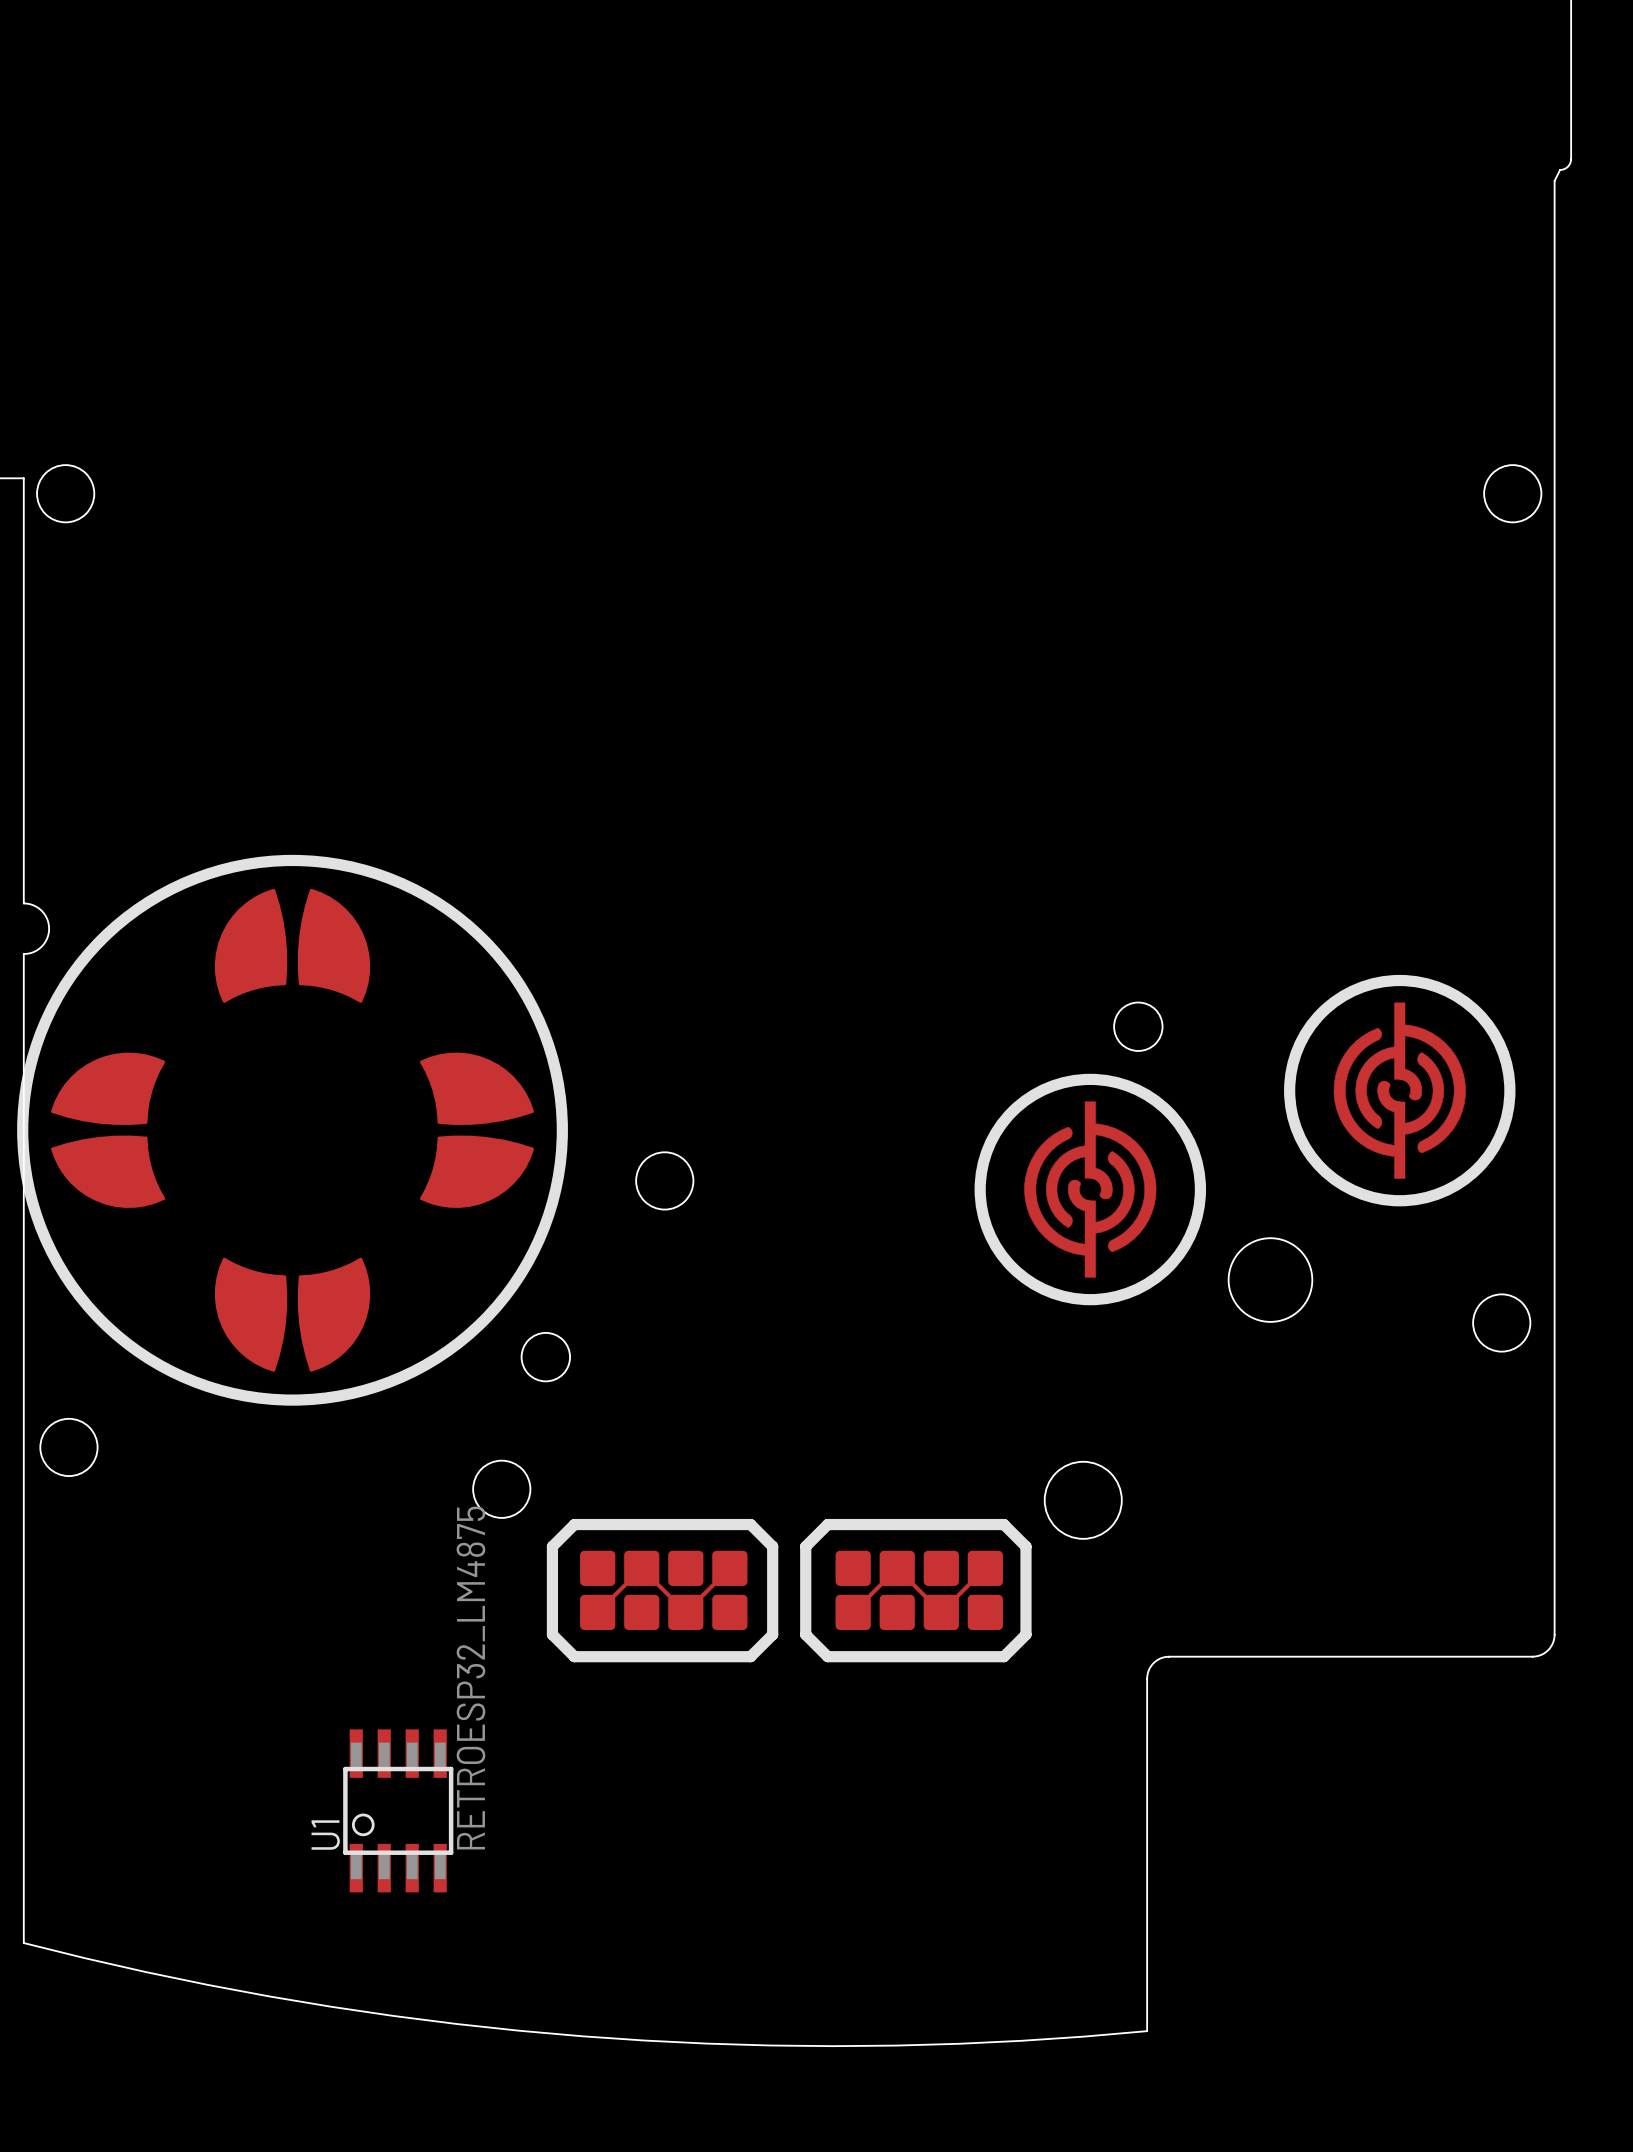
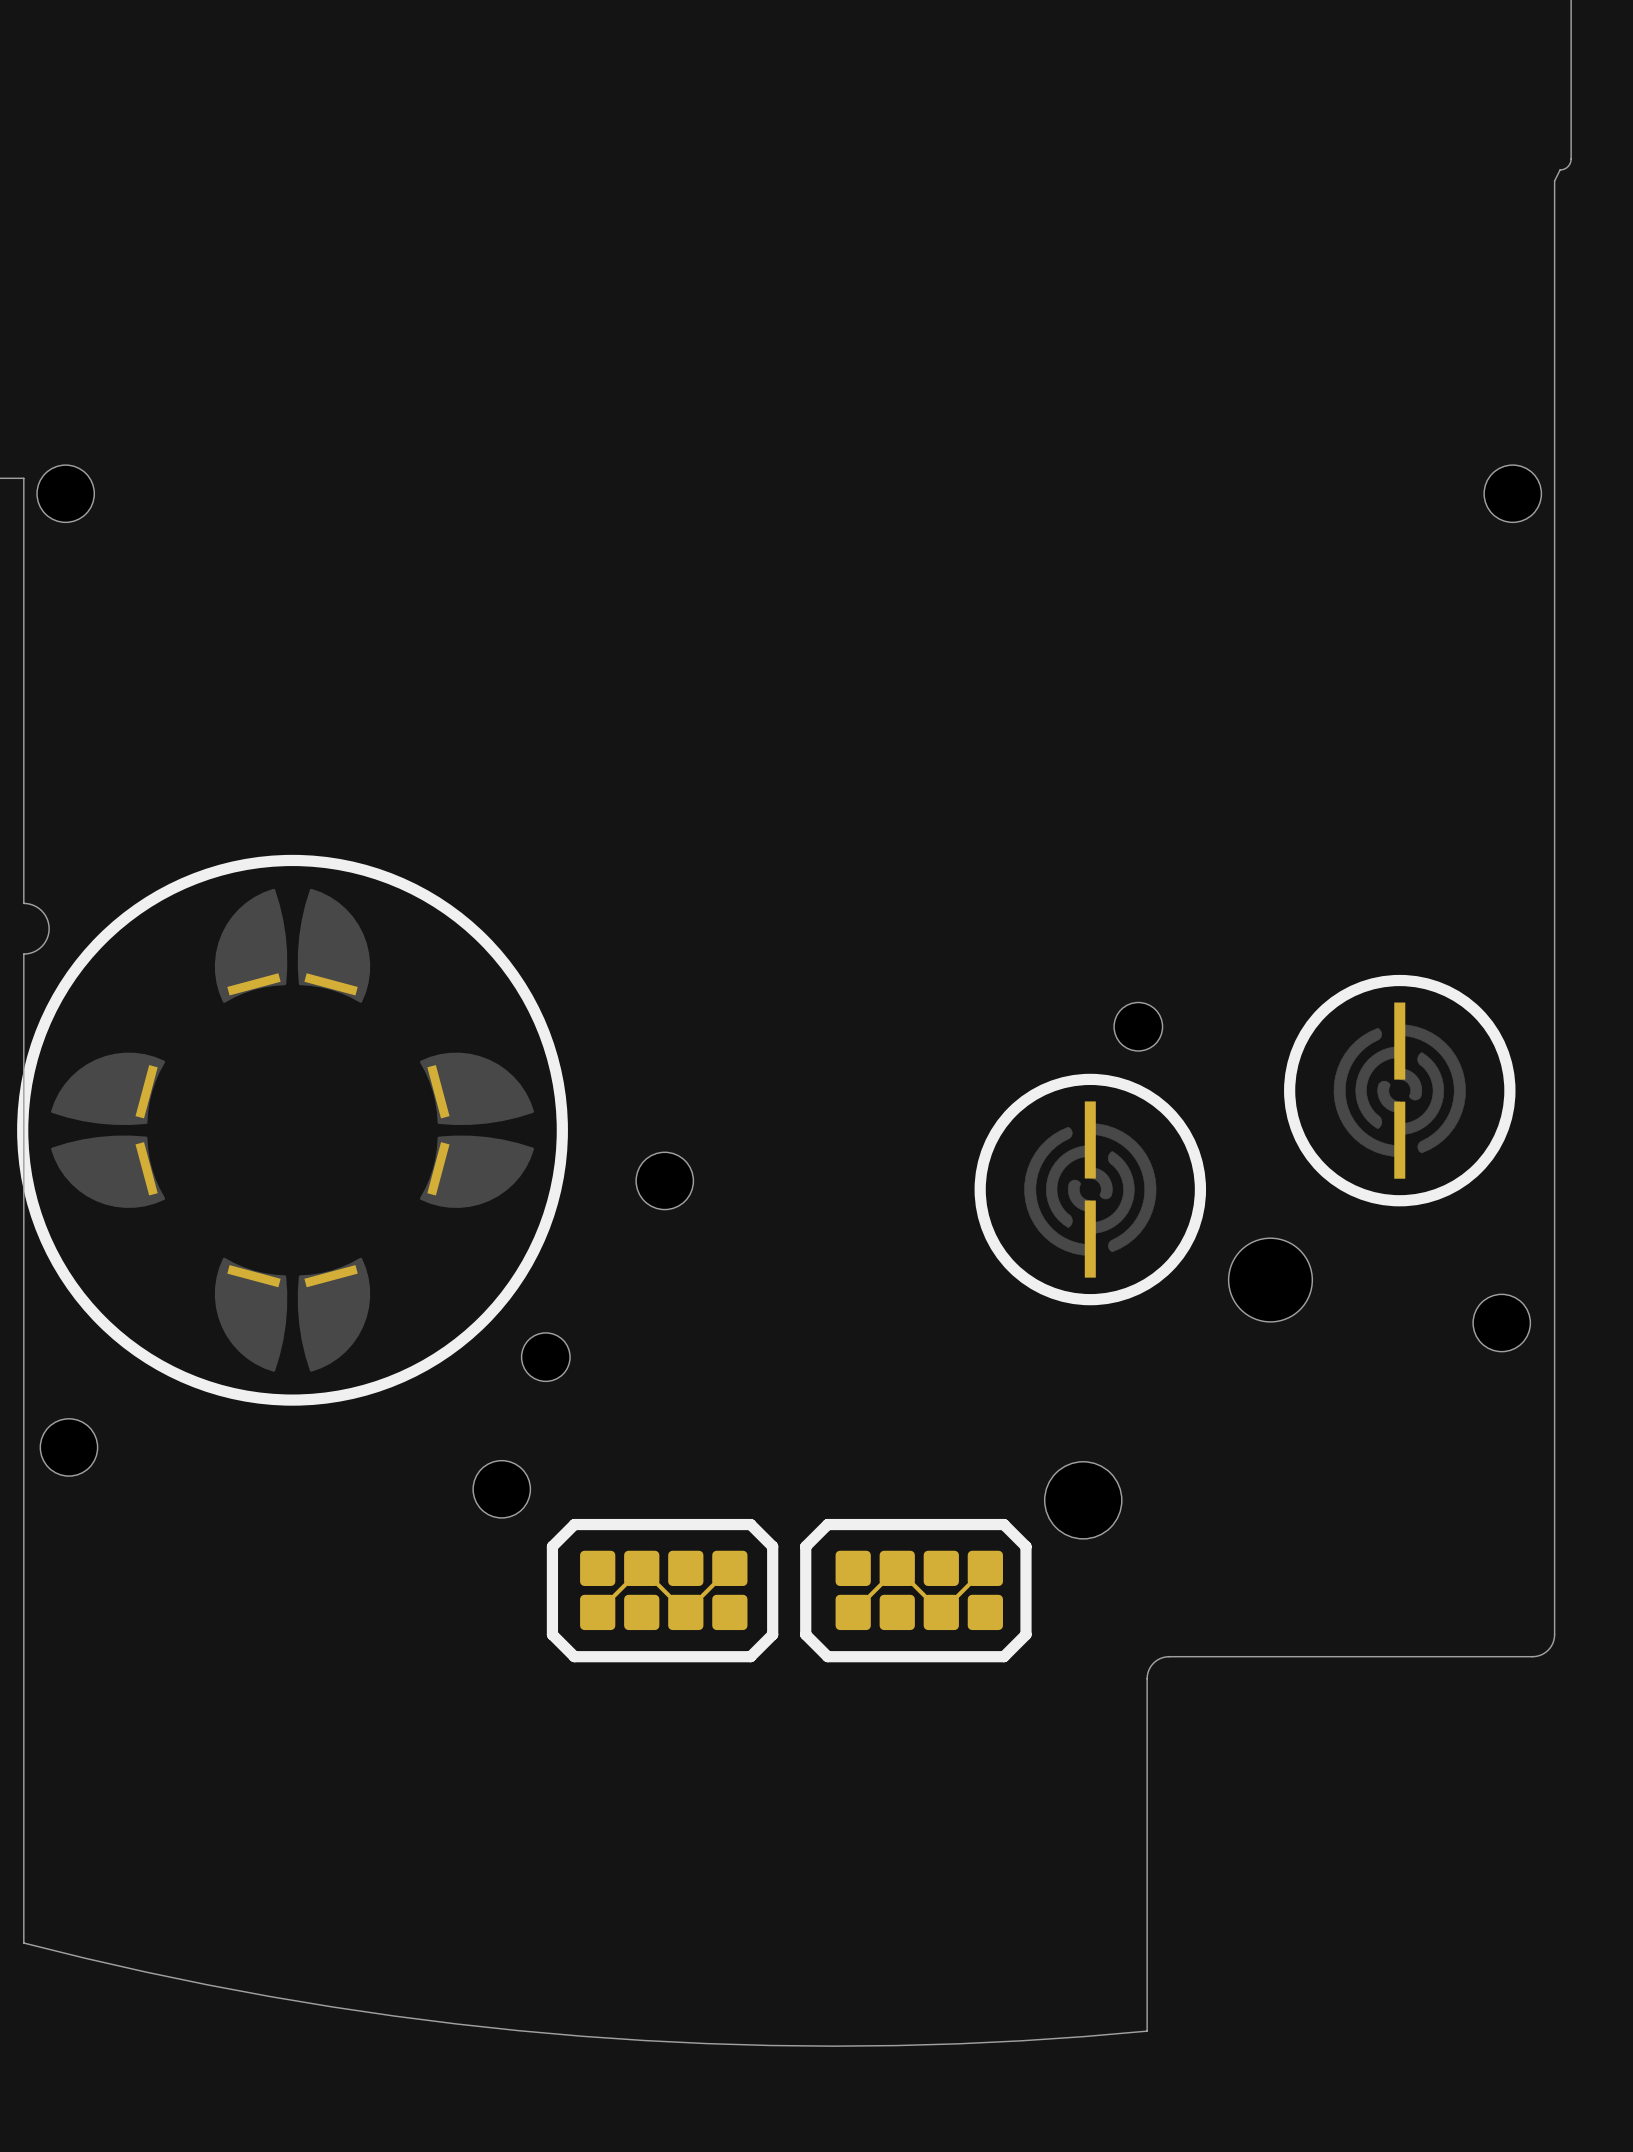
U1: RETROESP32_LM4875 (398, 1810) -> none

